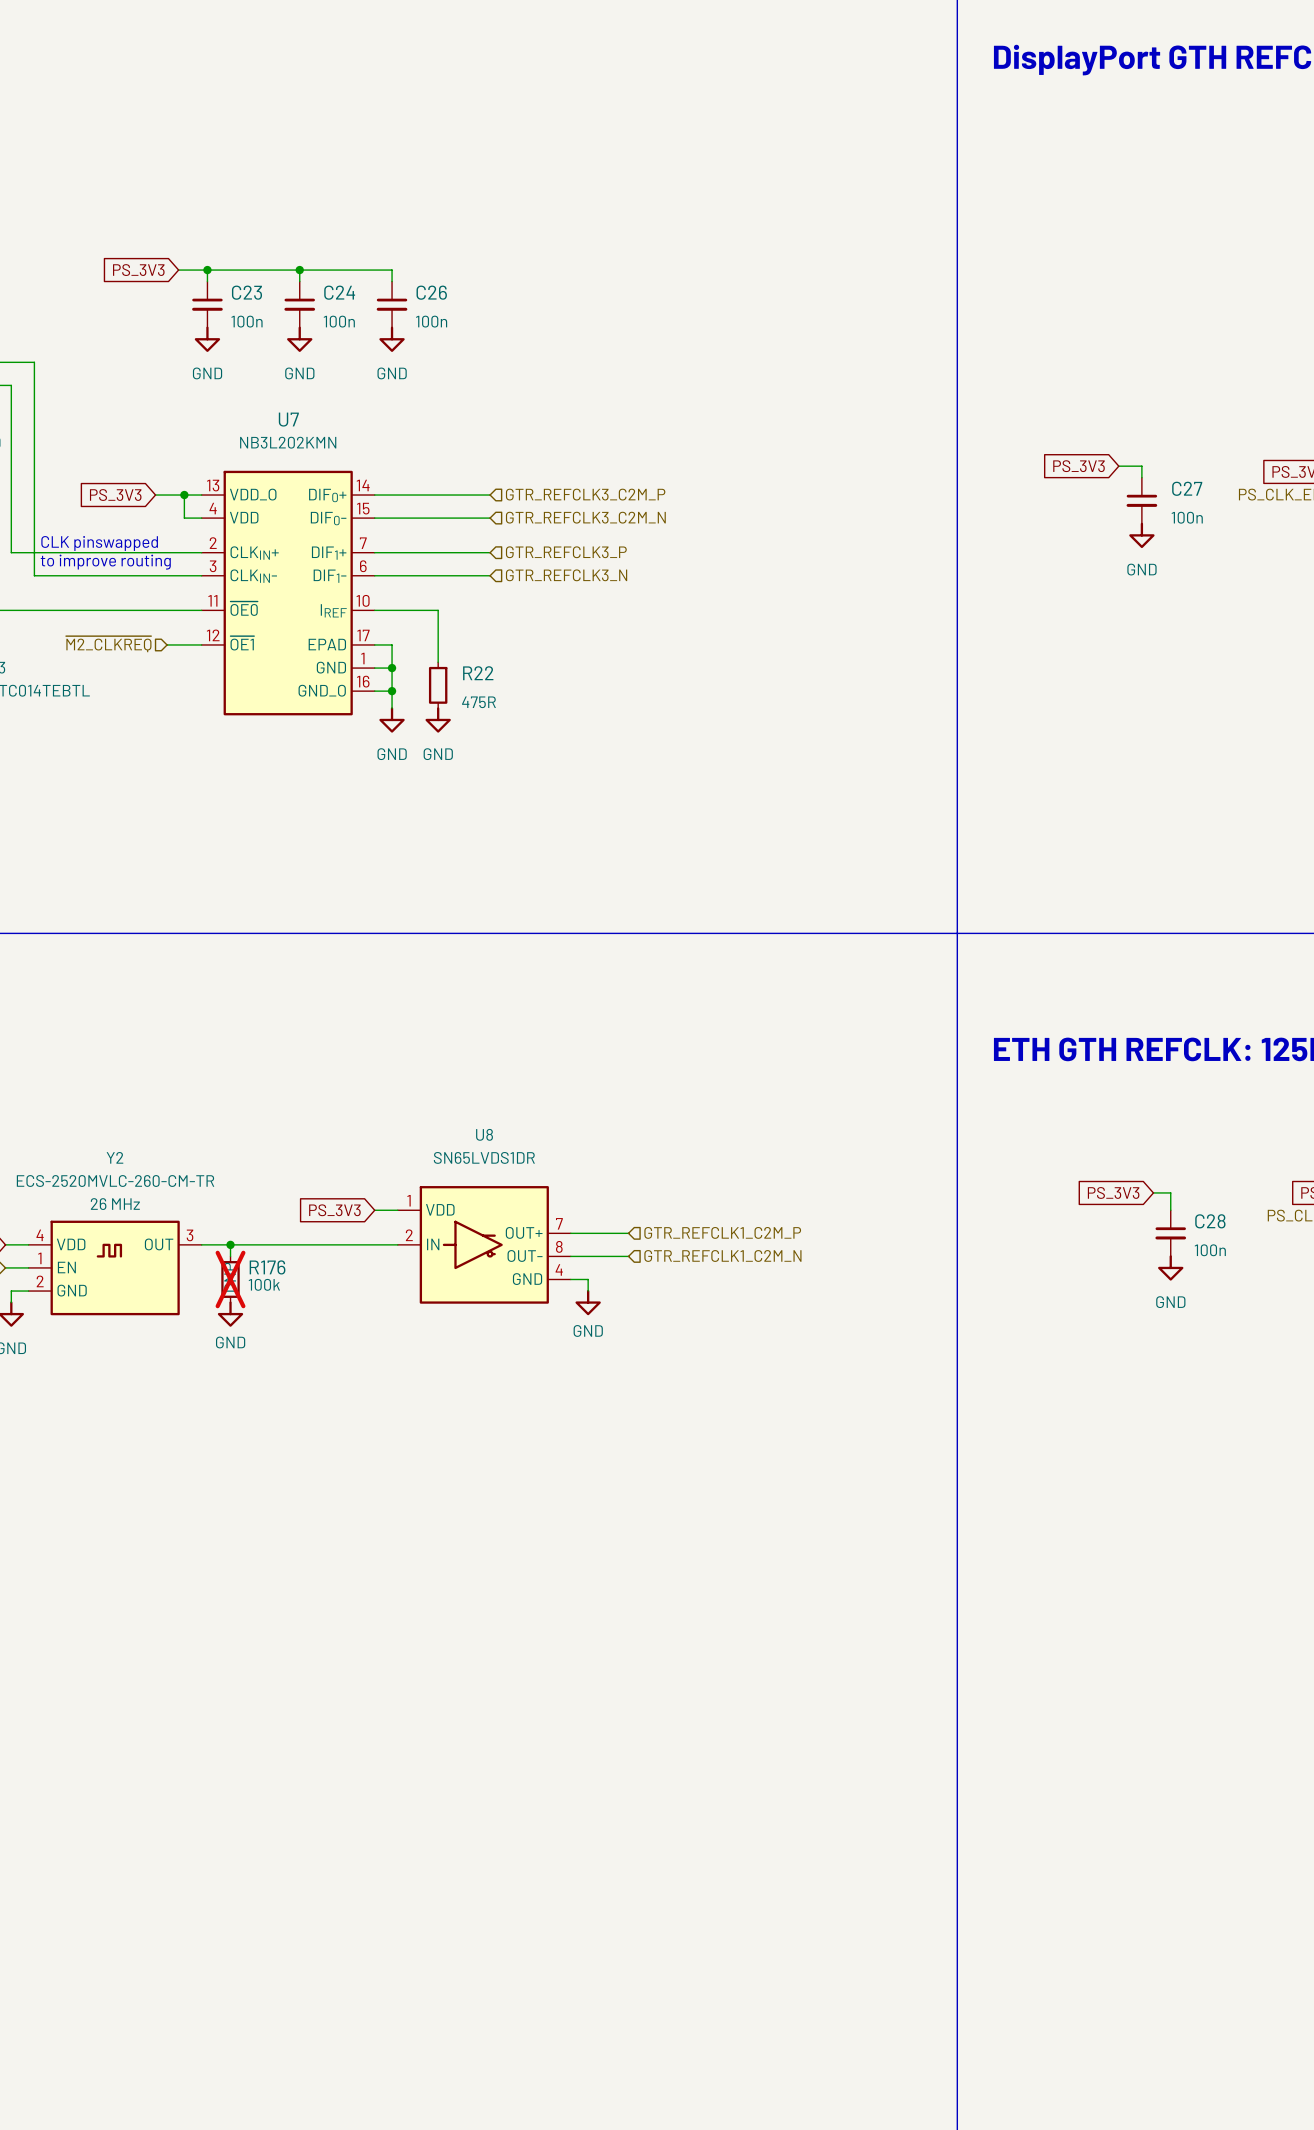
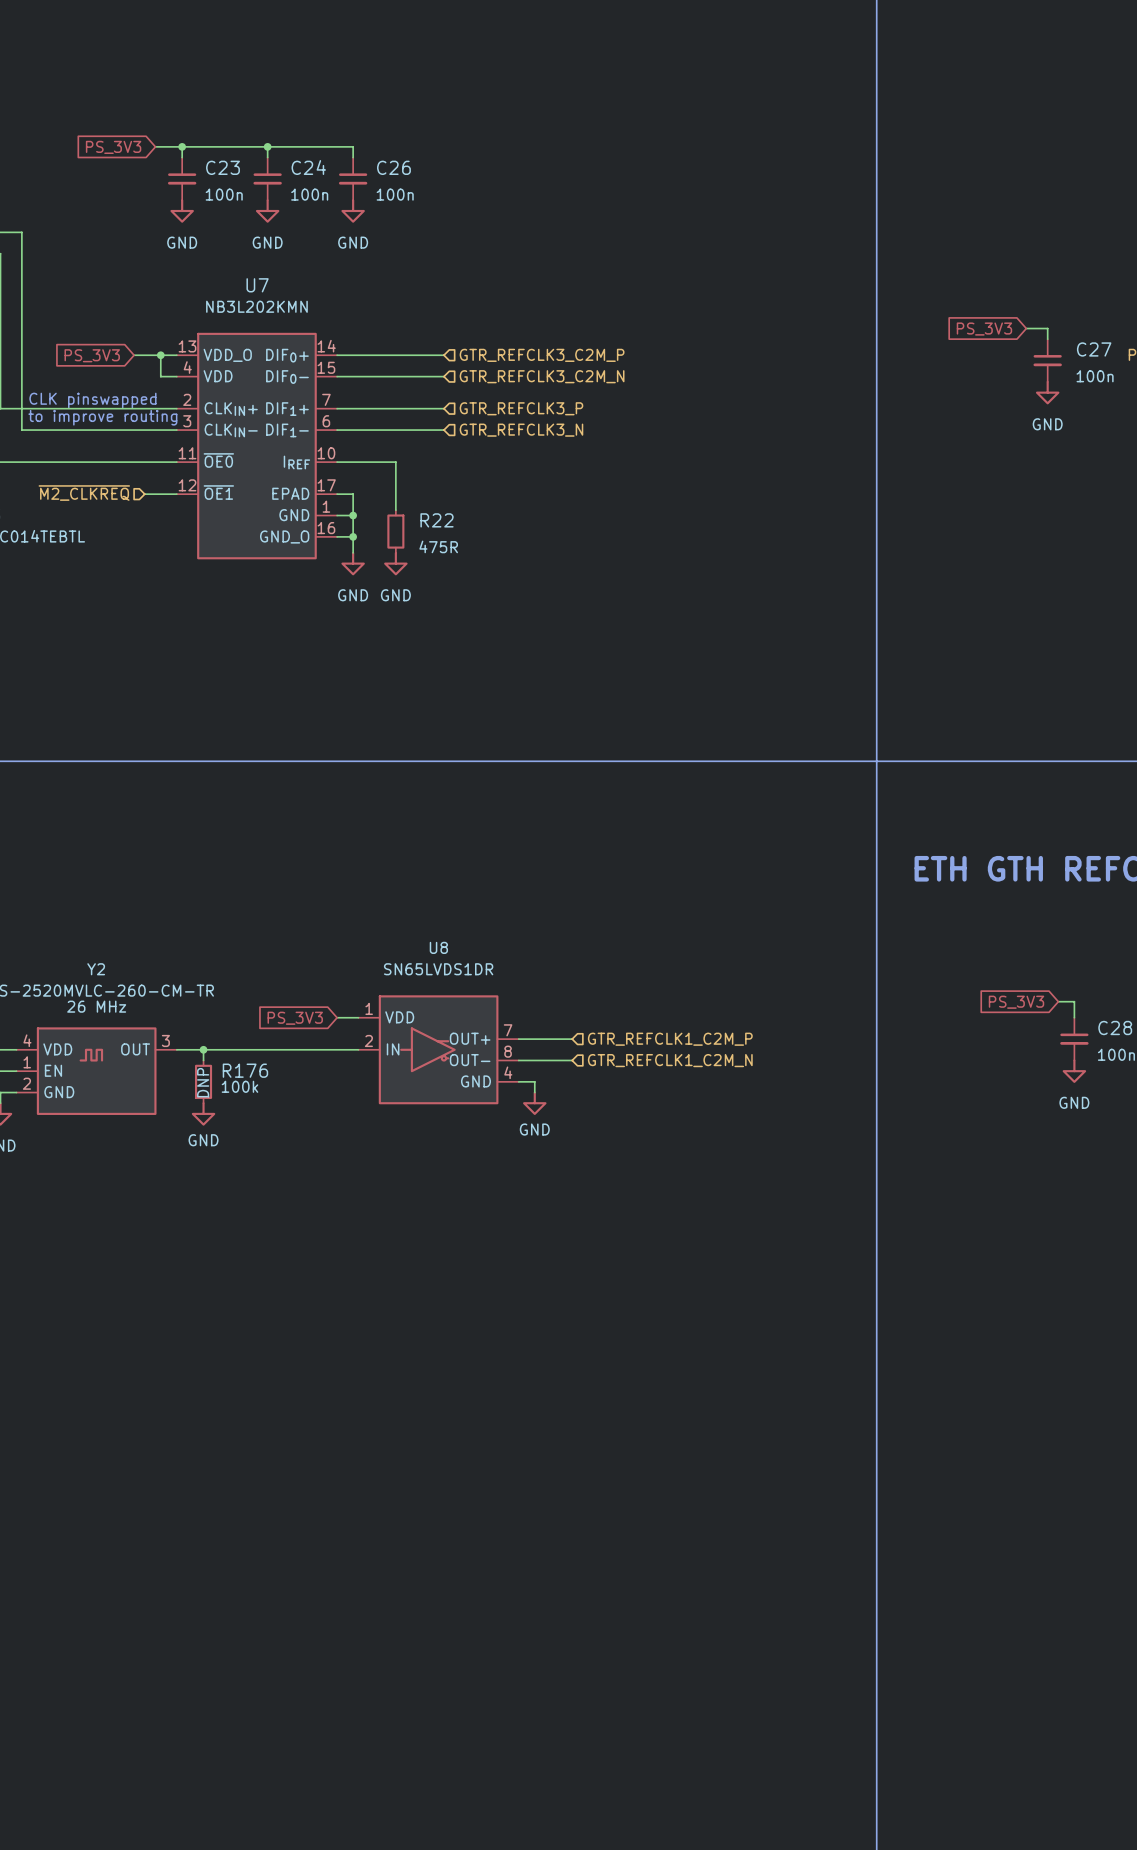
Y2 text: none -> 26 MHz (96, 1006)
Y2 text: 26 MHz (115, 1204) -> none
R176 do-not-place cross: (230, 1279) -> none

